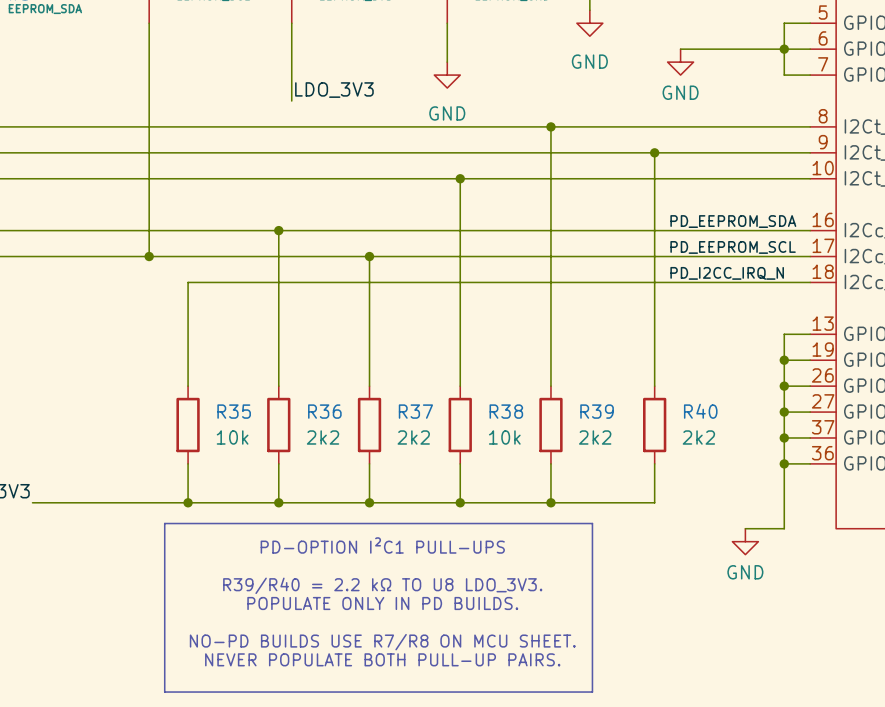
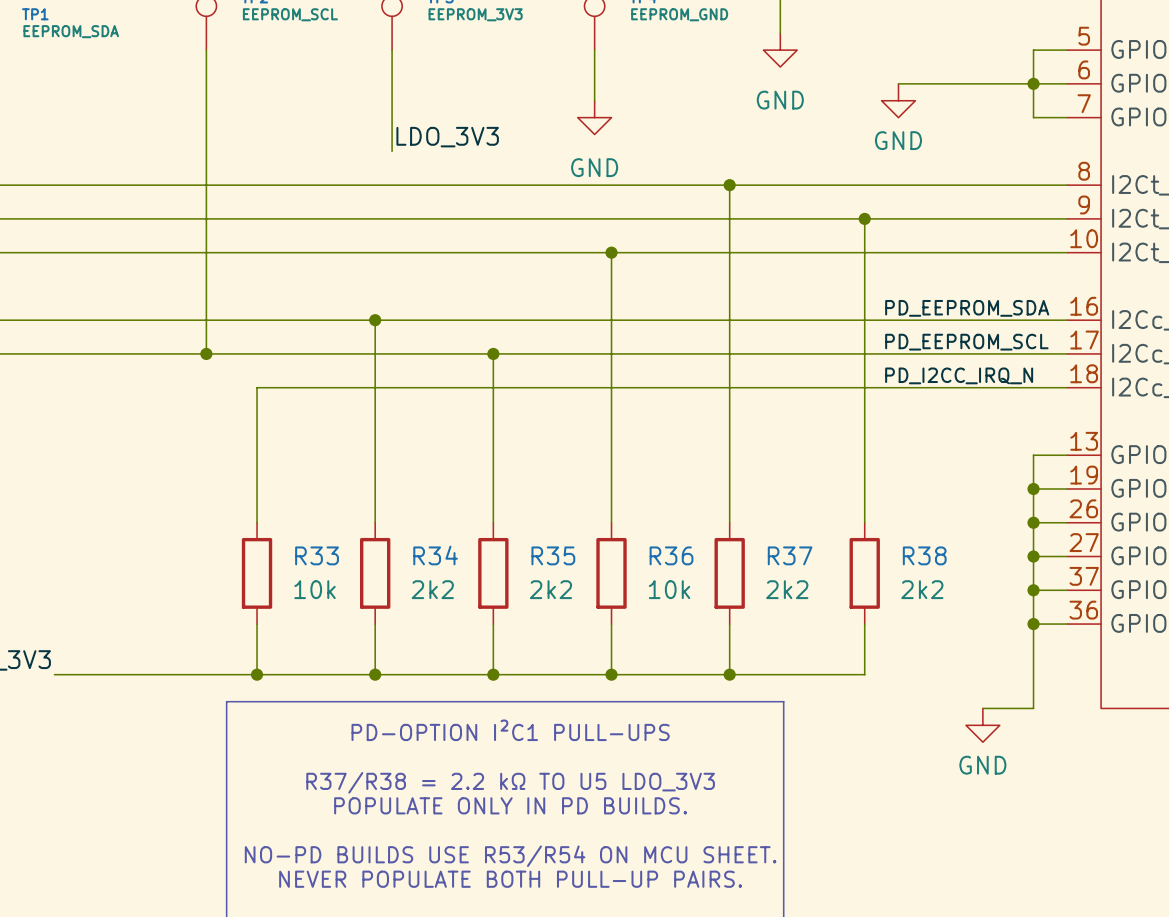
R35 name: R35 (234, 411) -> R33 (317, 555)
R36 name: R36 (324, 411) -> R34 (435, 555)
R37 name: R37 (415, 411) -> R35 (553, 555)
R38 name: R38 (506, 411) -> R36 (671, 555)
R39 name: R39 (597, 411) -> R37 (790, 555)
R40 name: R40 (700, 411) -> R38 (924, 555)
text: R39/R40 = 2.2 kΩ TO U8 LDO_3V3. (382, 585) -> R37/R38 = 2.2 kΩ TO U5 LDO_3V3 (510, 782)
text: NO-PD BUILDS USE R7/R8 ON MCU SHEET. (382, 642) -> NO-PD BUILDS USE R53/R54 ON MCU SHEET. (510, 856)

